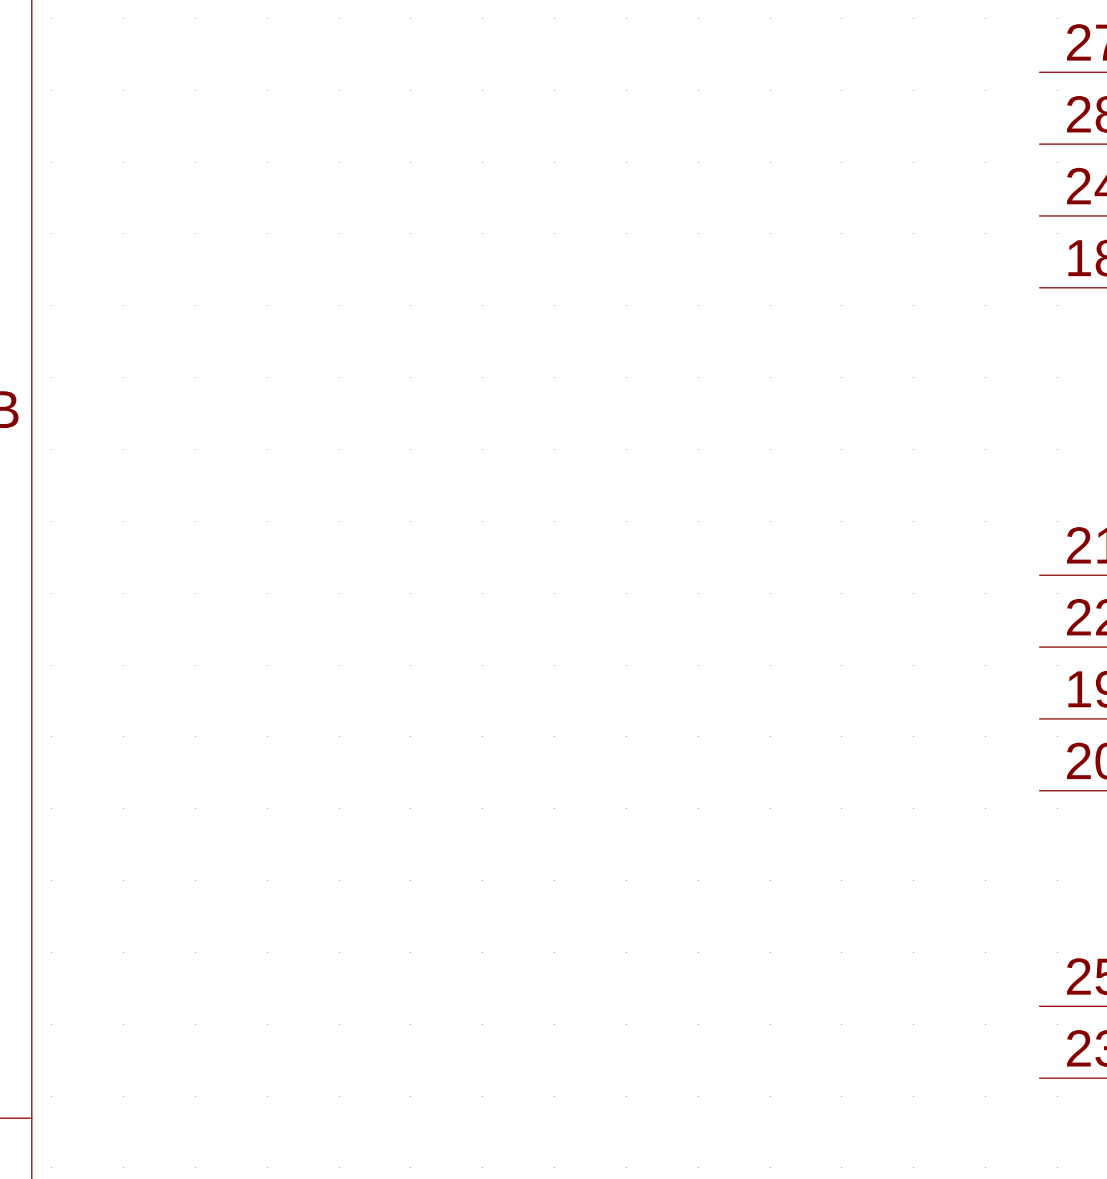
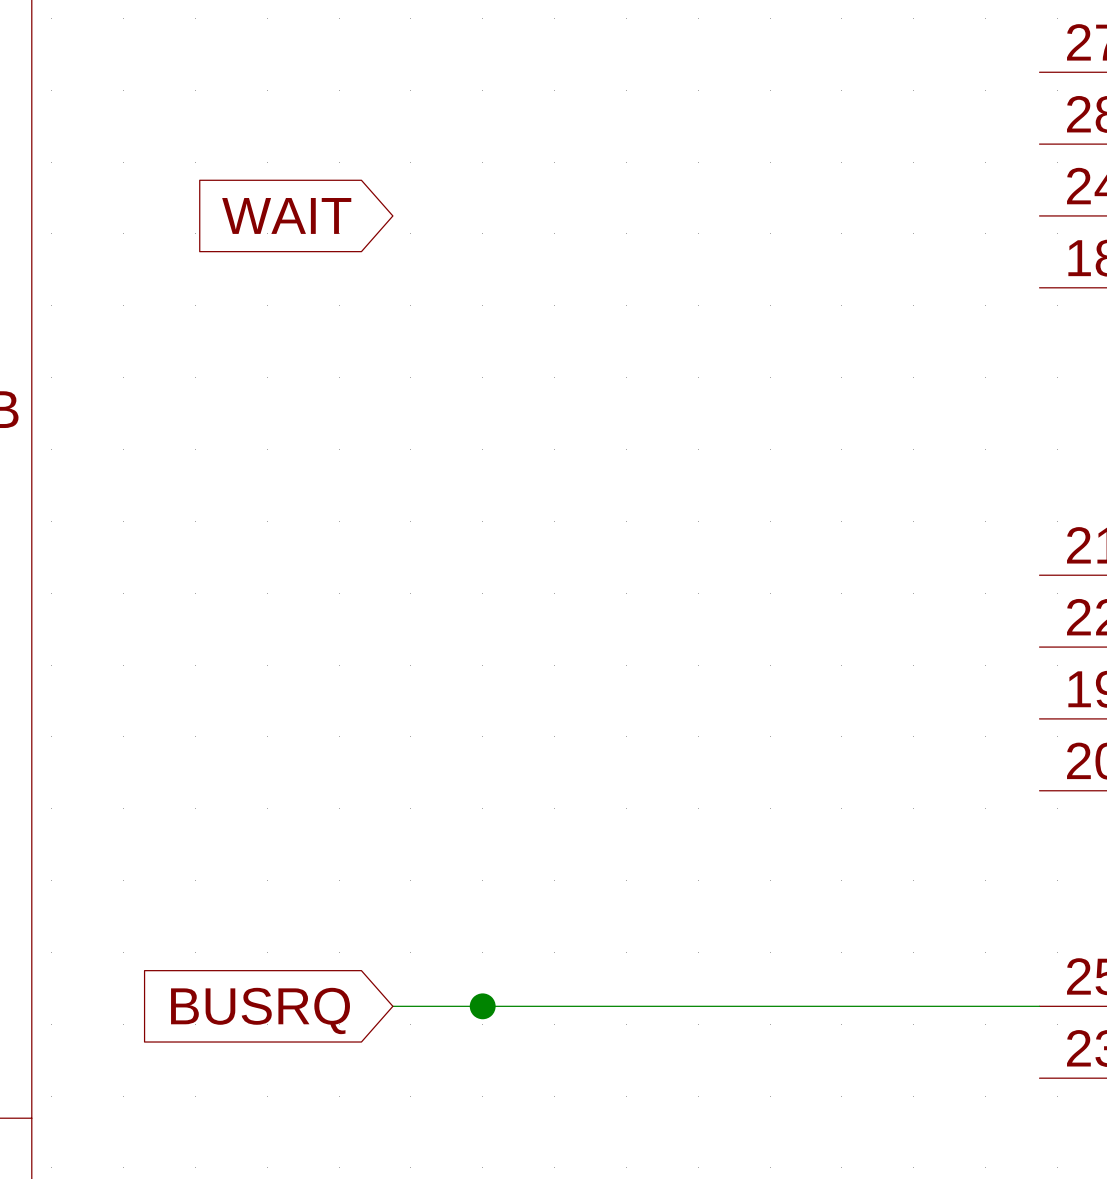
global label: none -> WAIT (286, 215)
wire: none -> (392, 1006) (1039, 1006)
junction: none -> (482, 1006)
global label: none -> BUSRQ (260, 1010)

